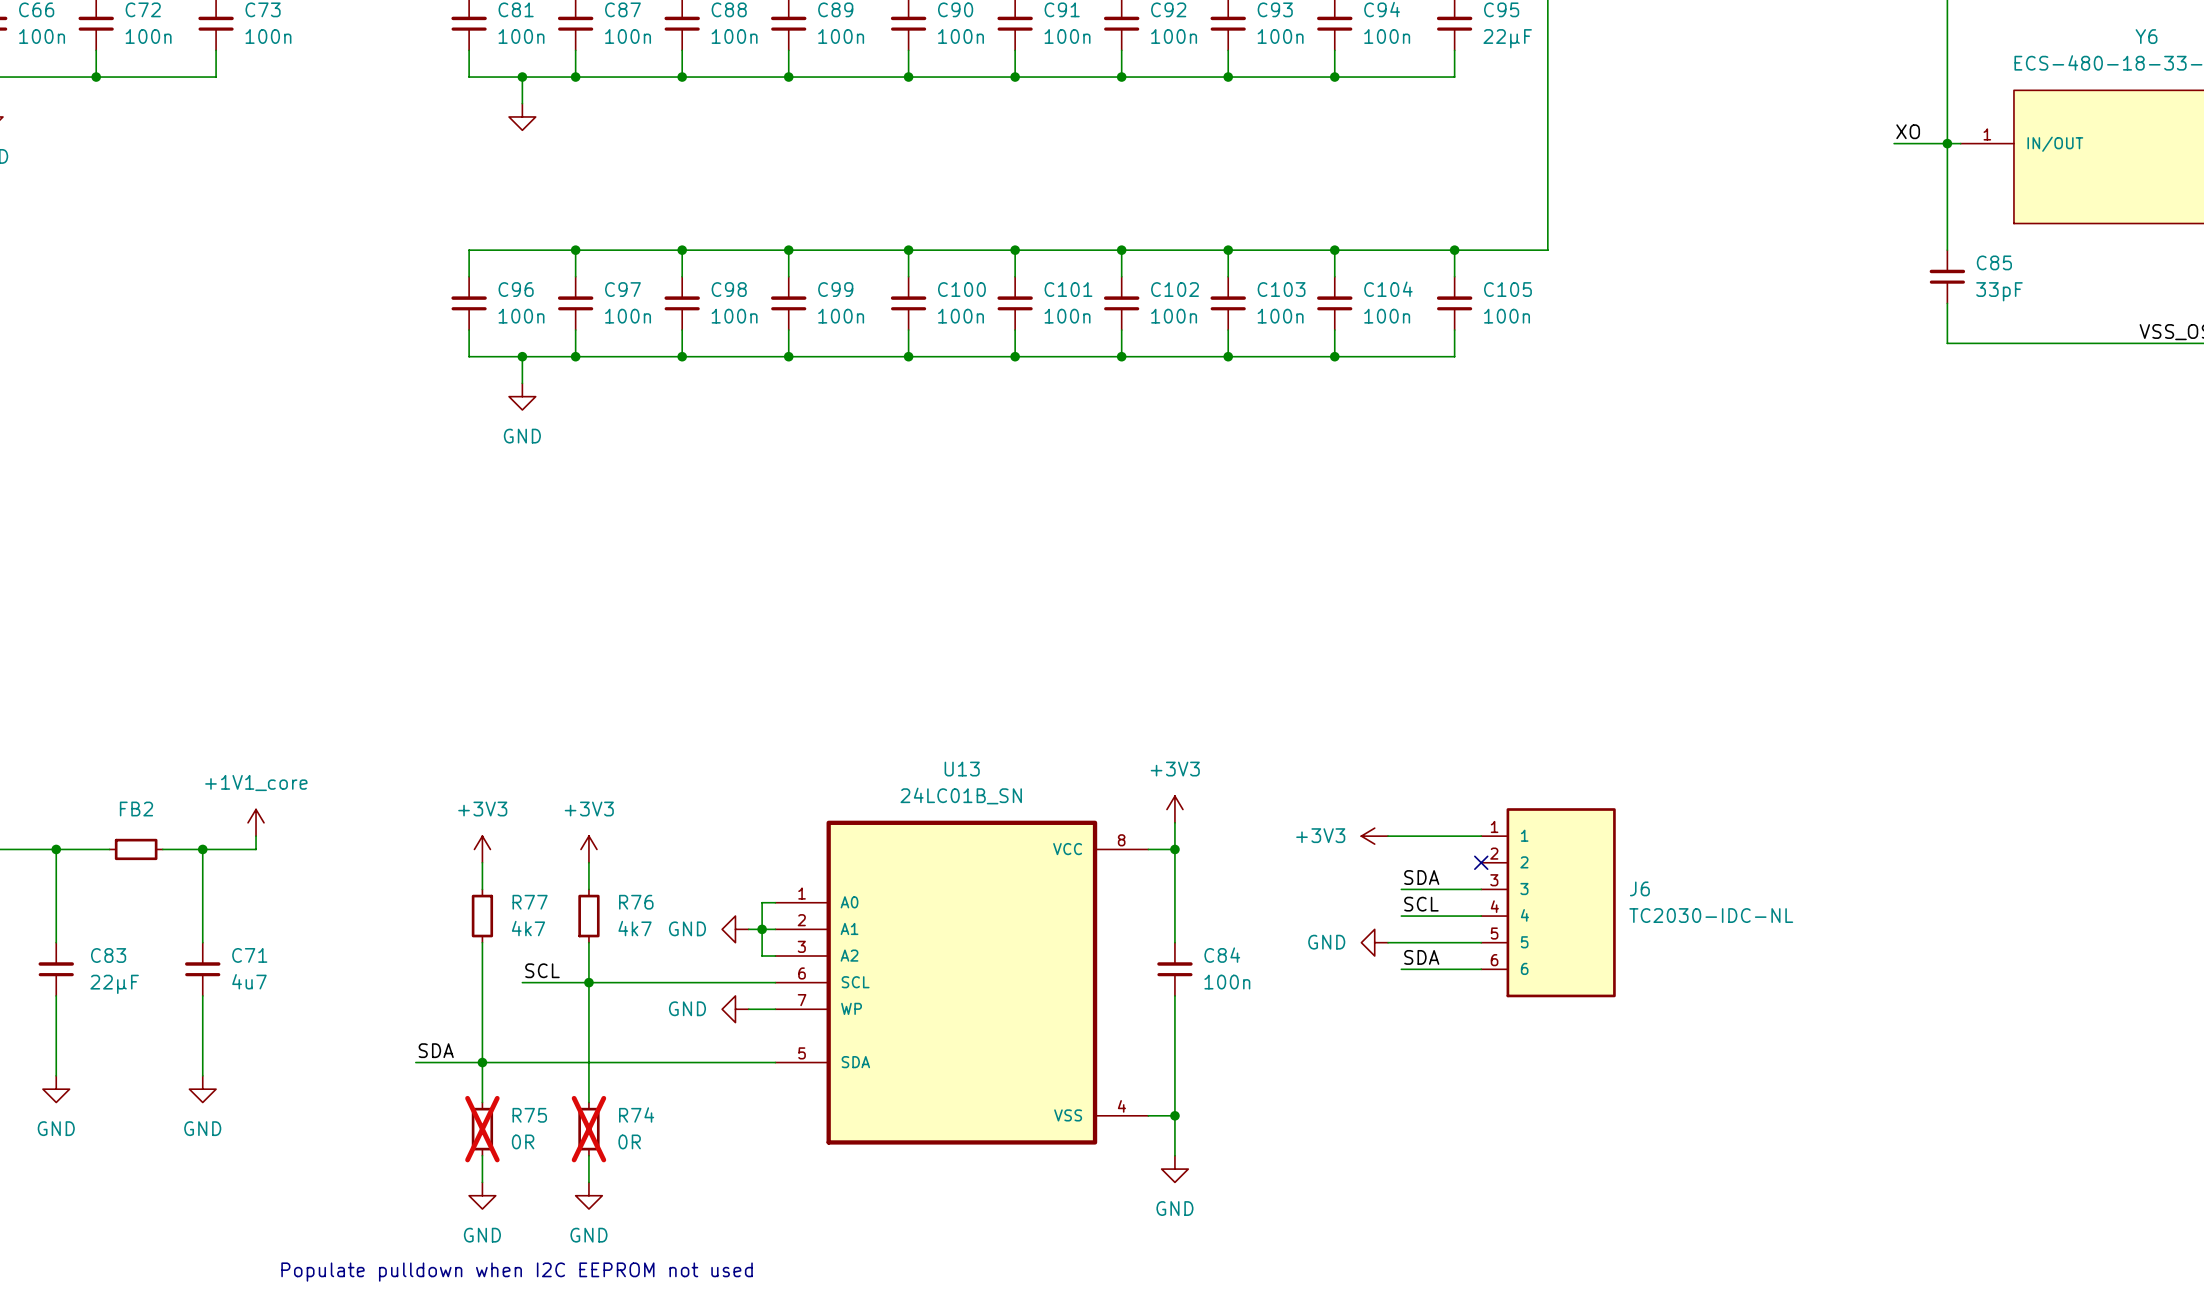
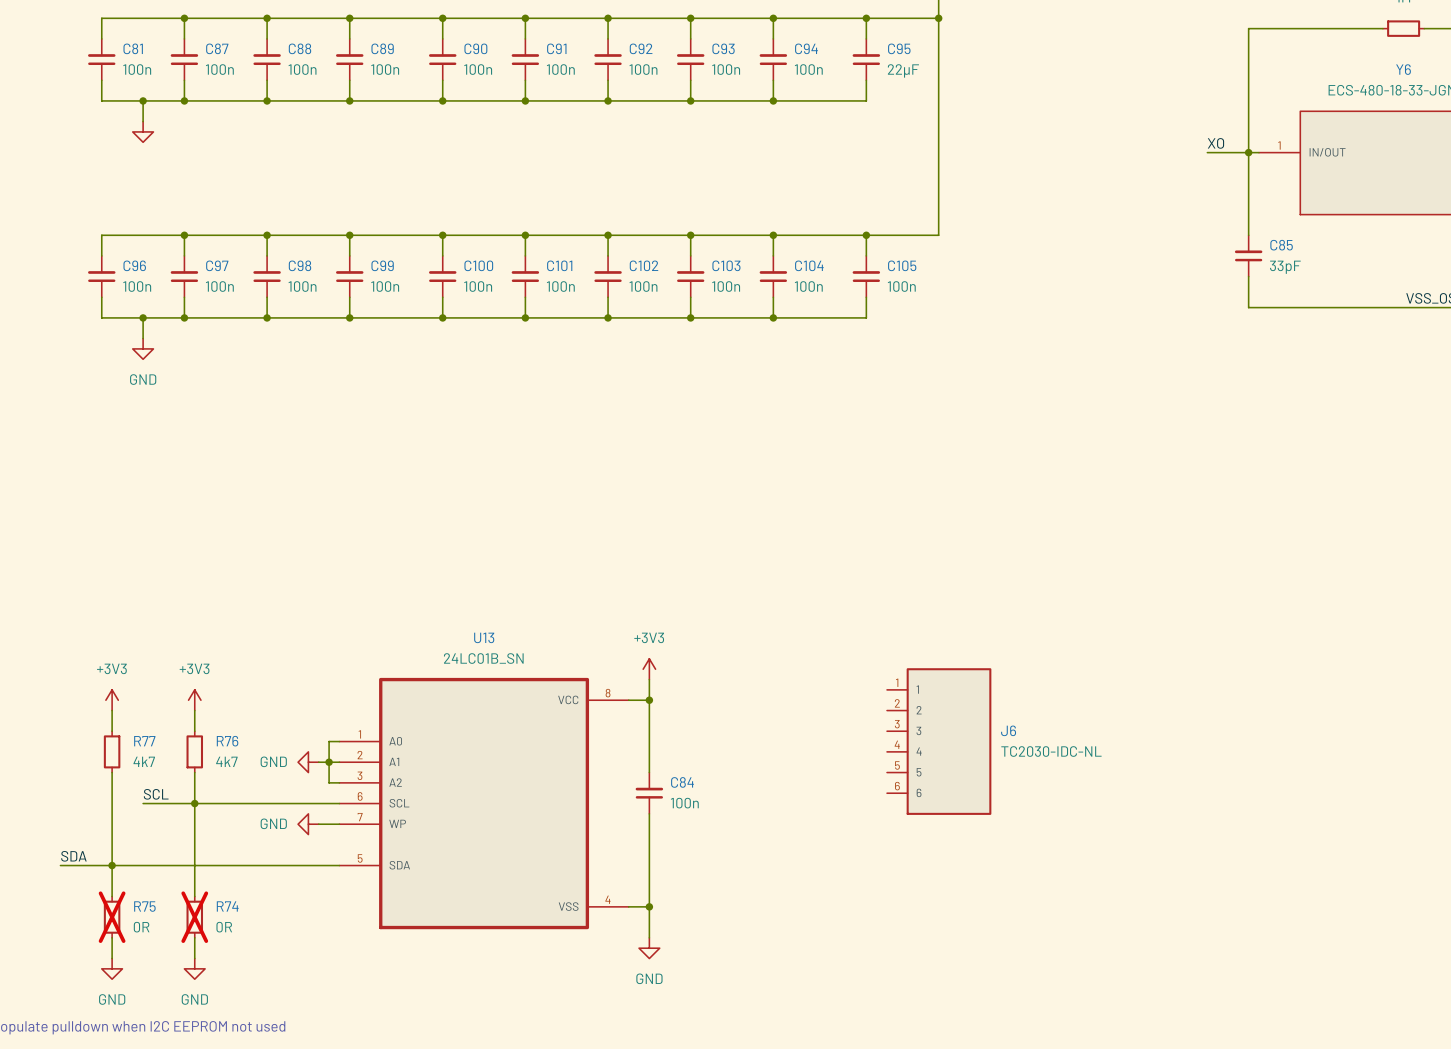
power symbol: +3V3 (1374, 836) -> none
wire: (1388, 836) (1481, 836) -> none
no-connect mark: (1481, 862) -> none
label: SDA (1421, 877) -> none
wire: (1401, 889) (1481, 889) -> none
label: SCL (1421, 904) -> none
wire: (1401, 916) (1481, 916) -> none
power symbol: GND (1374, 942) -> none
wire: (1388, 942) (1481, 942) -> none
label: SDA (1421, 957) -> none
wire: (1401, 969) (1481, 969) -> none

